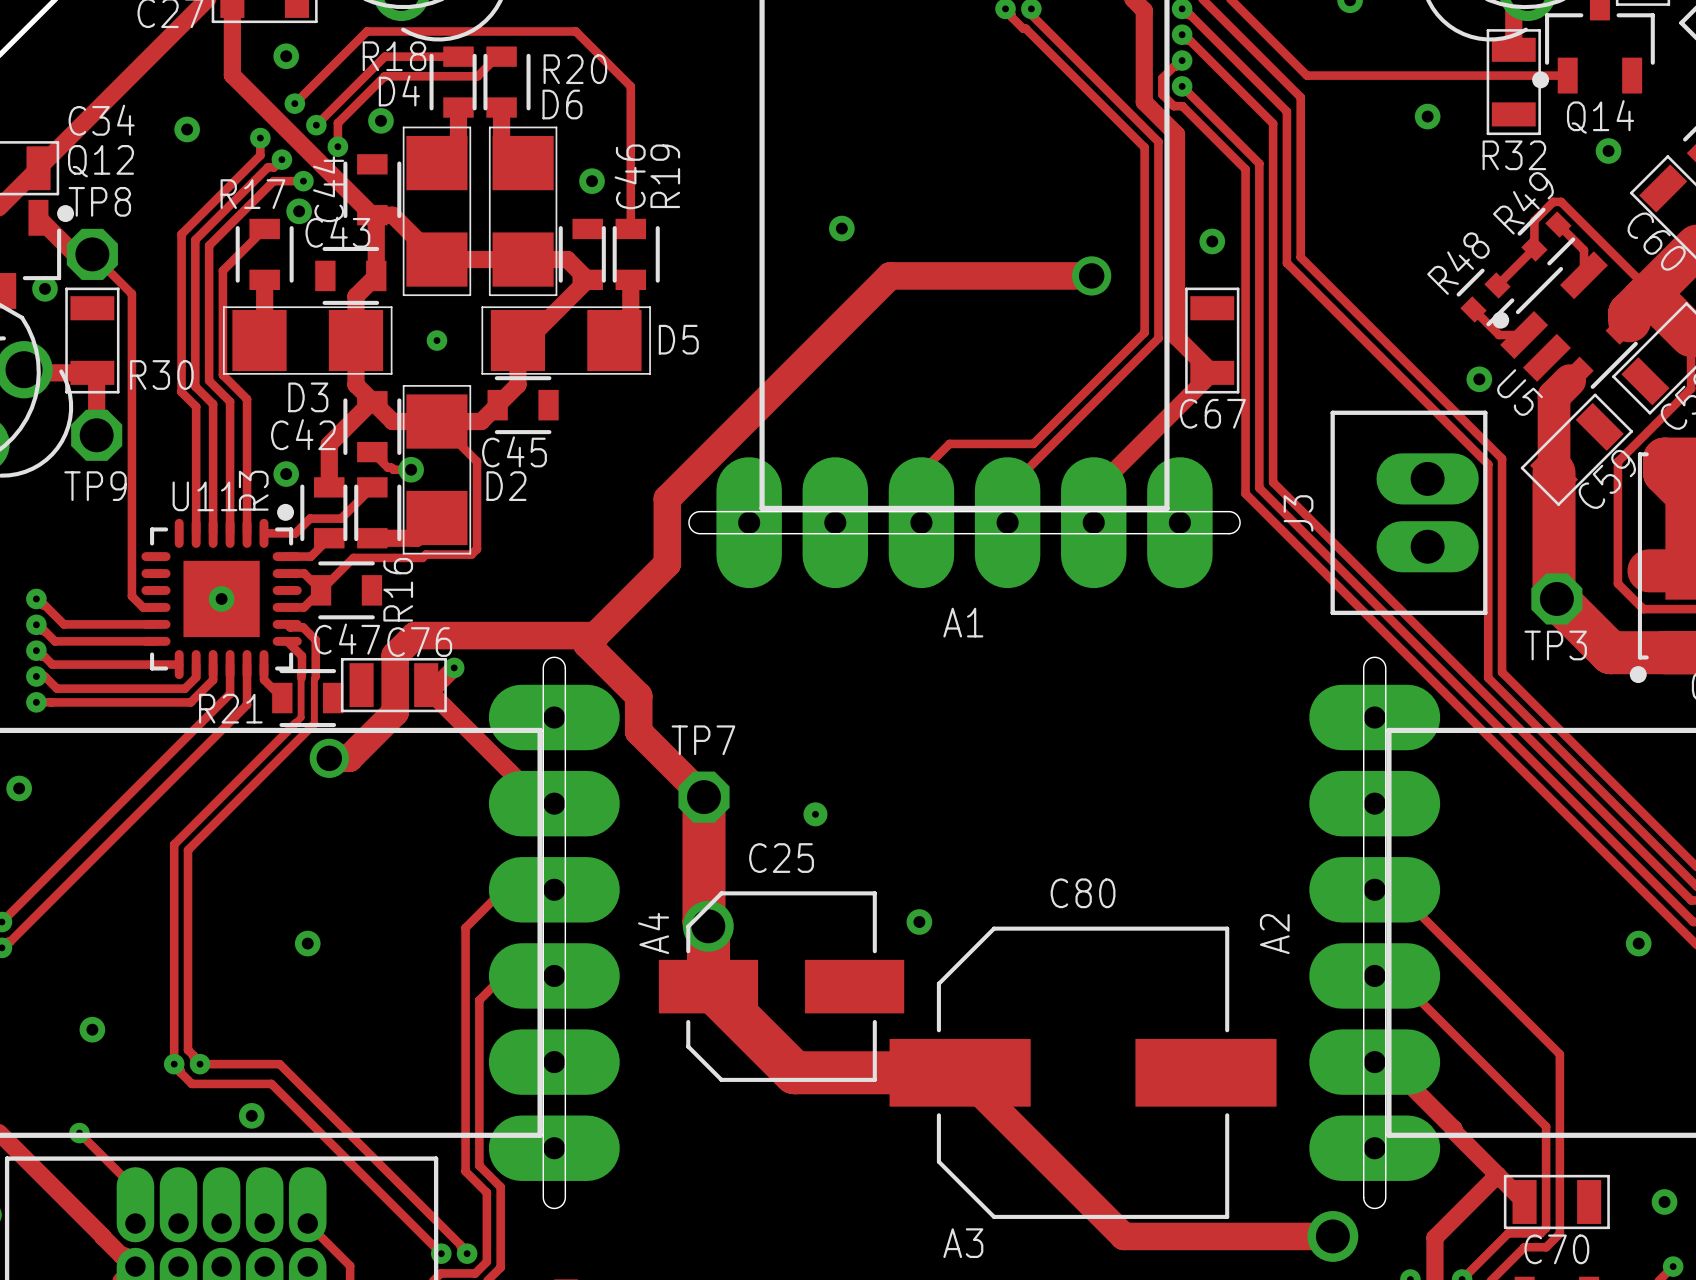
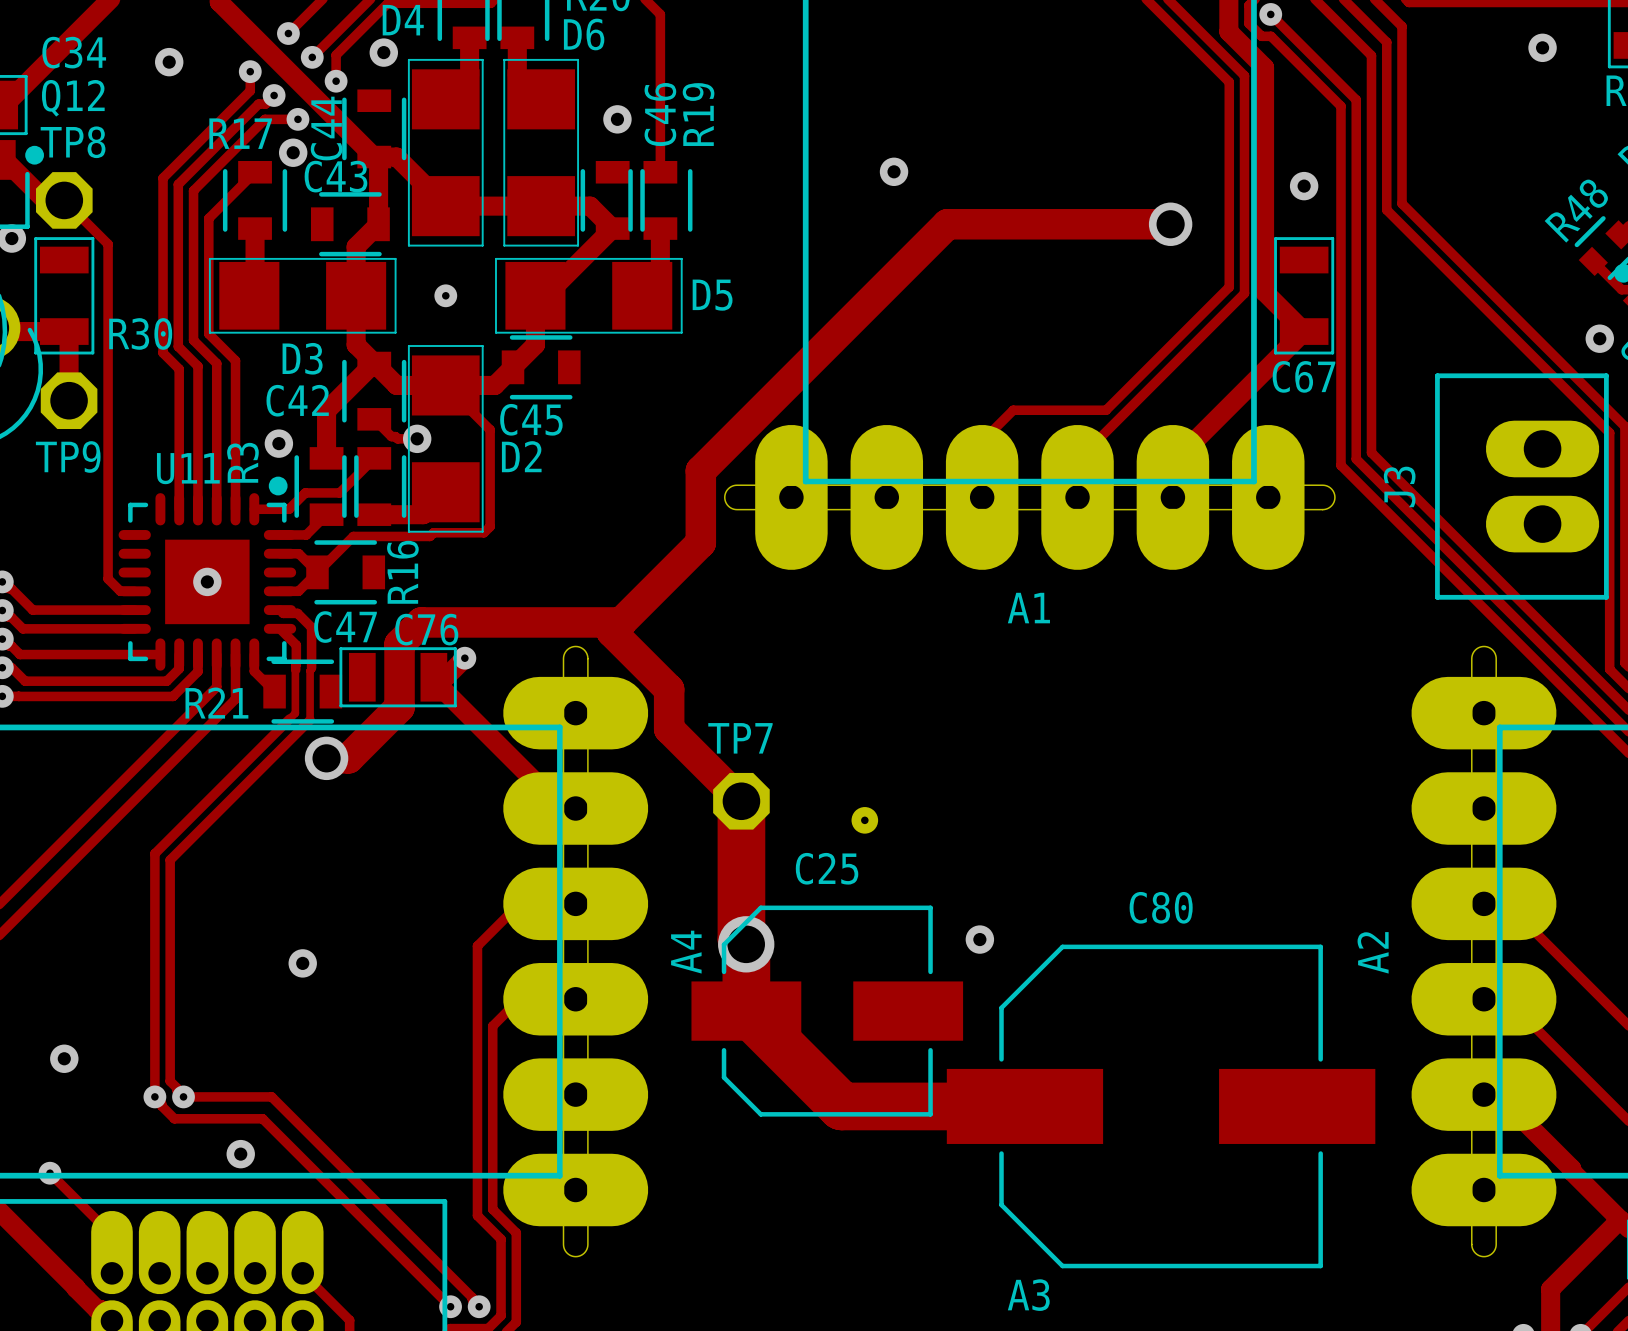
track: (960, 1072) (1123, 1236) (1332, 1236) -> none
via: (1332, 1236) -> none

